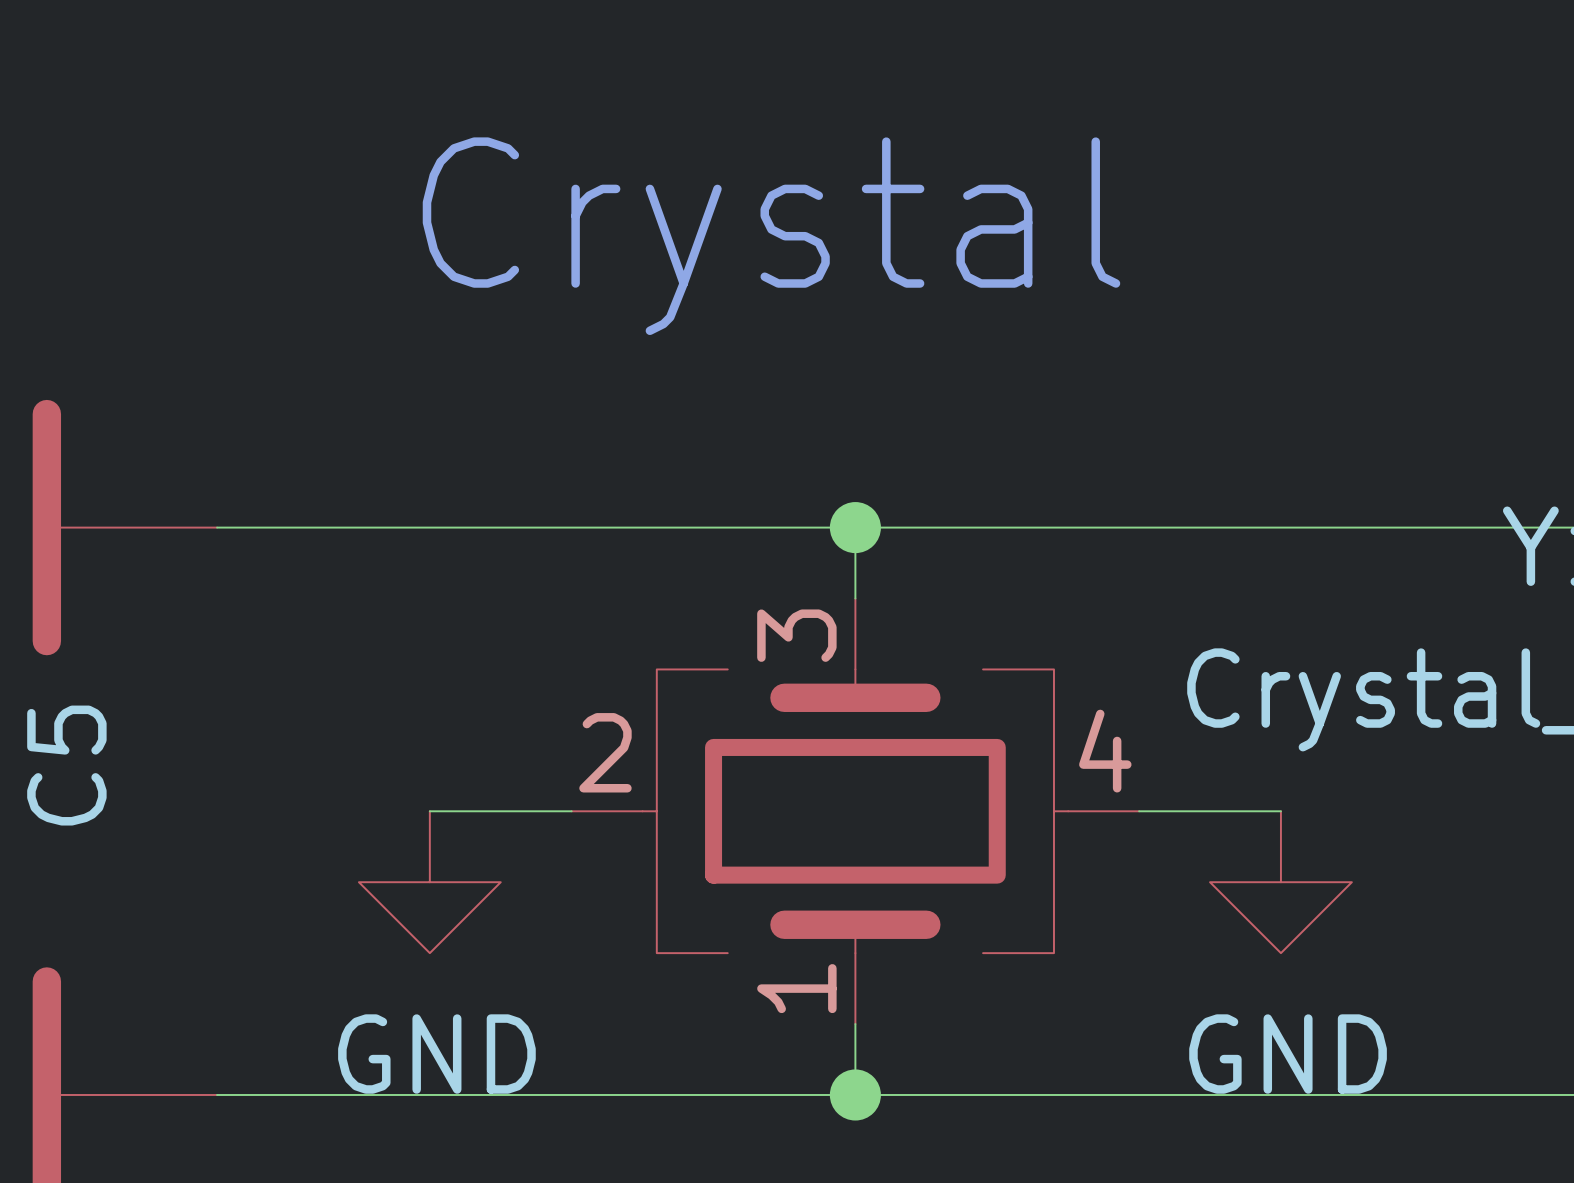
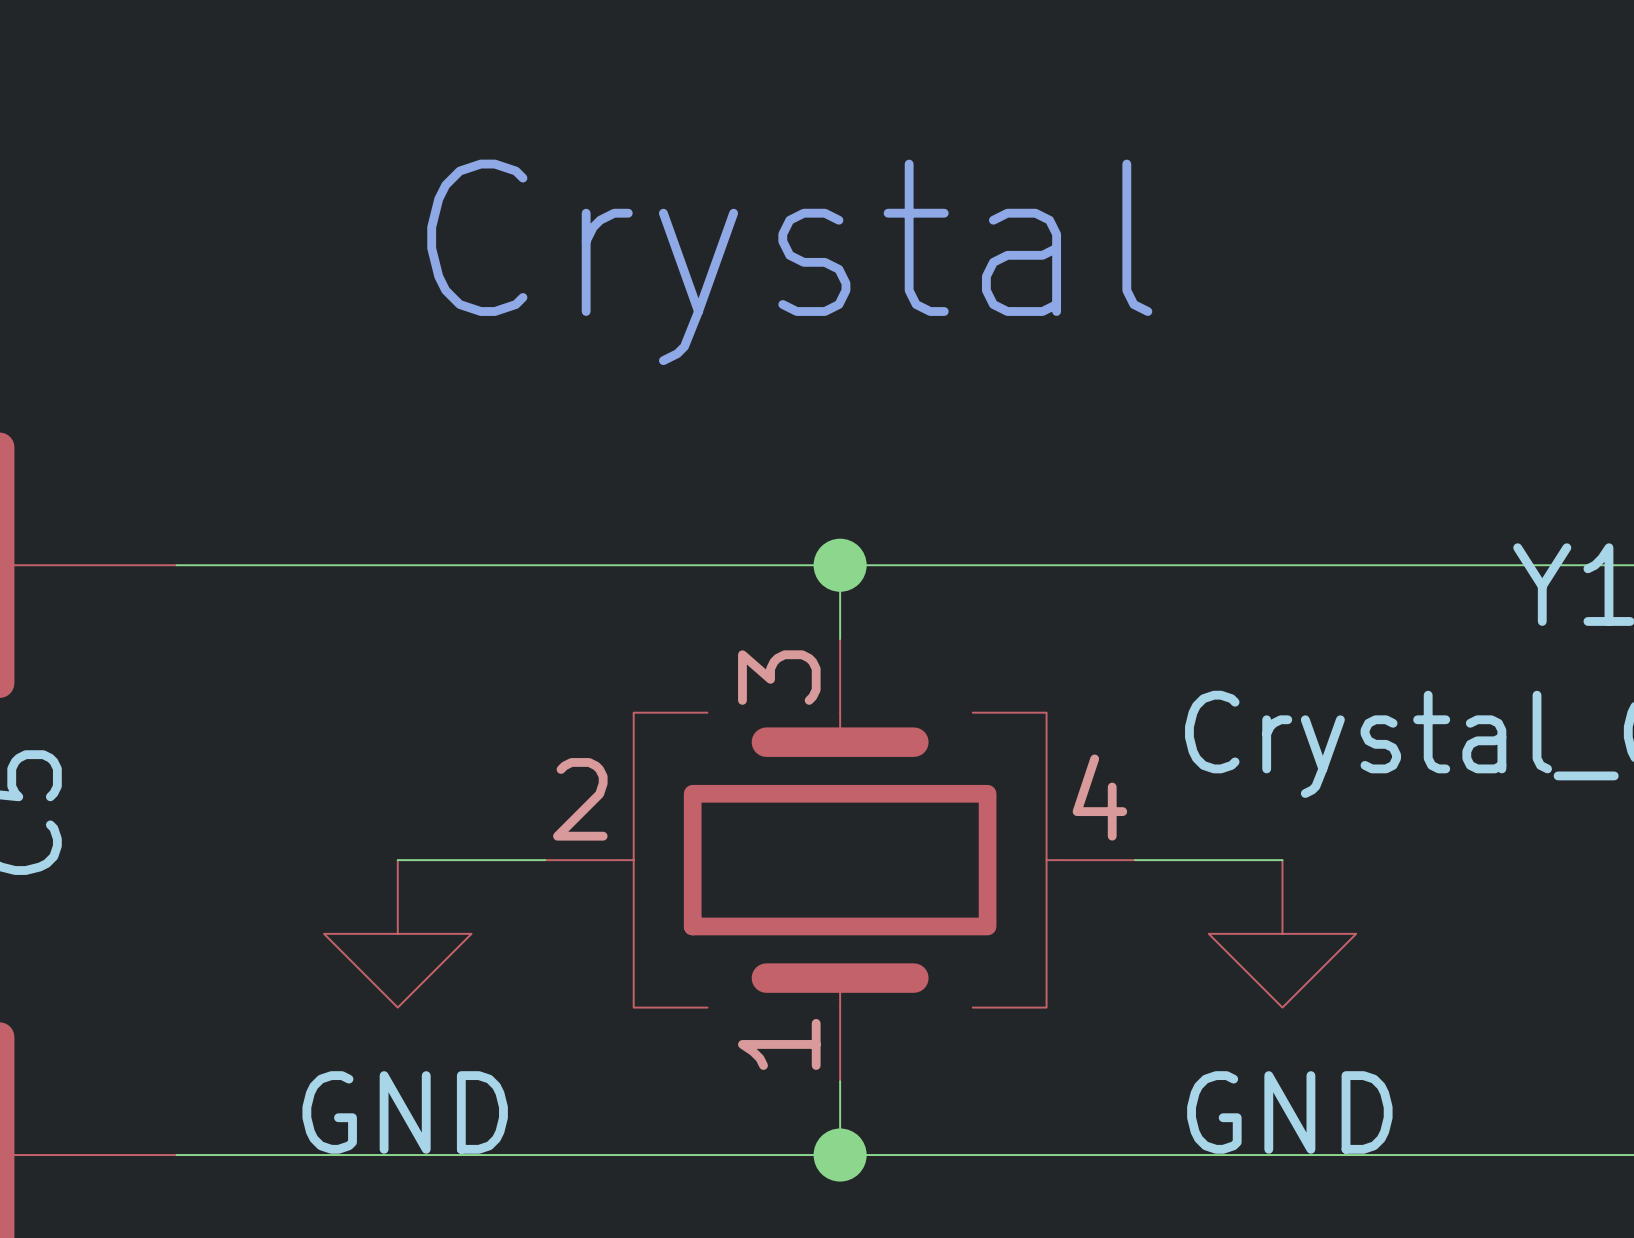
text position: Crystal (771, 236) -> Crystal (789, 262)

